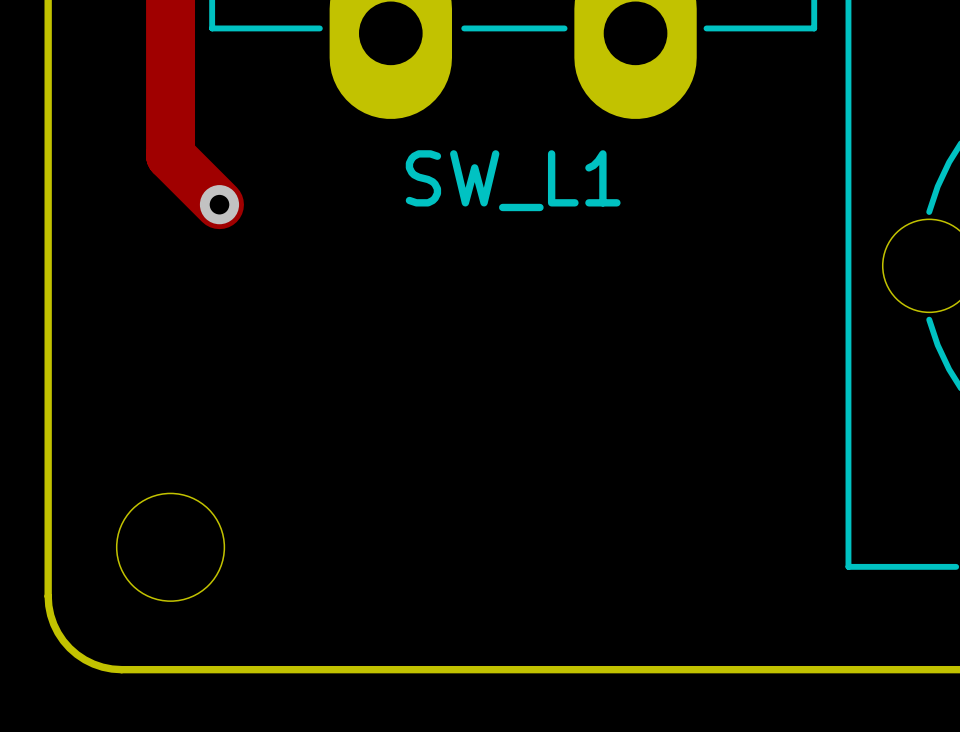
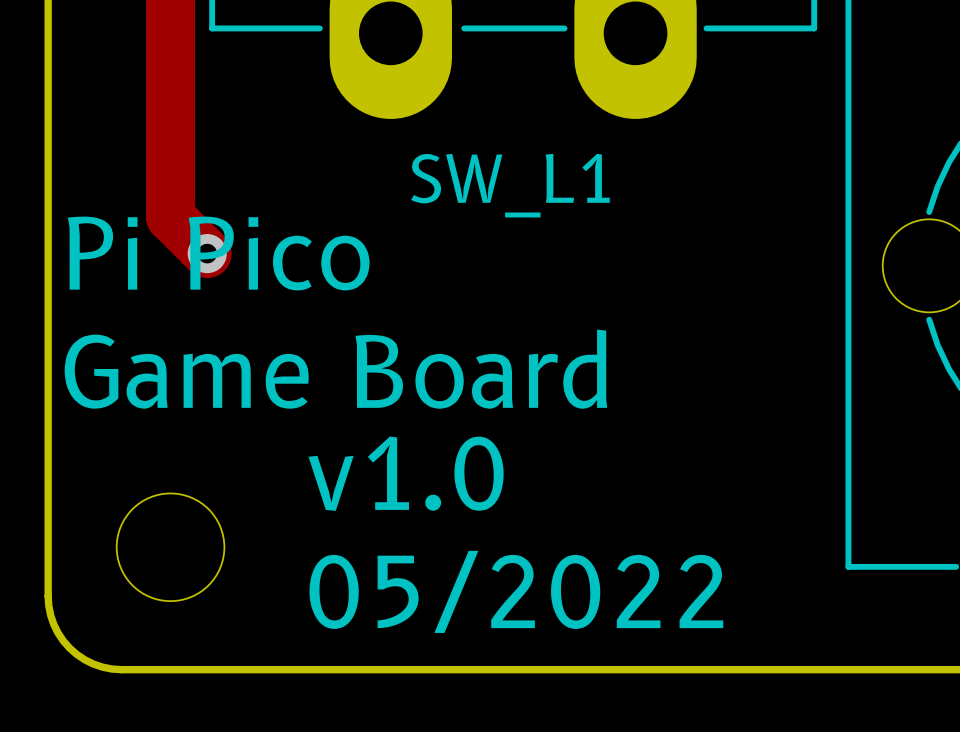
track: (170, 155) (219, 204) -> (170, 155) (170, 216) (207, 253)
via position: (219, 204) -> (207, 253)
text: none -> Pi Pico (218, 253)
text: none -> Game Board (335, 369)
text: none -> v1.0 (406, 473)
text: none -> 05/2022 (516, 591)

